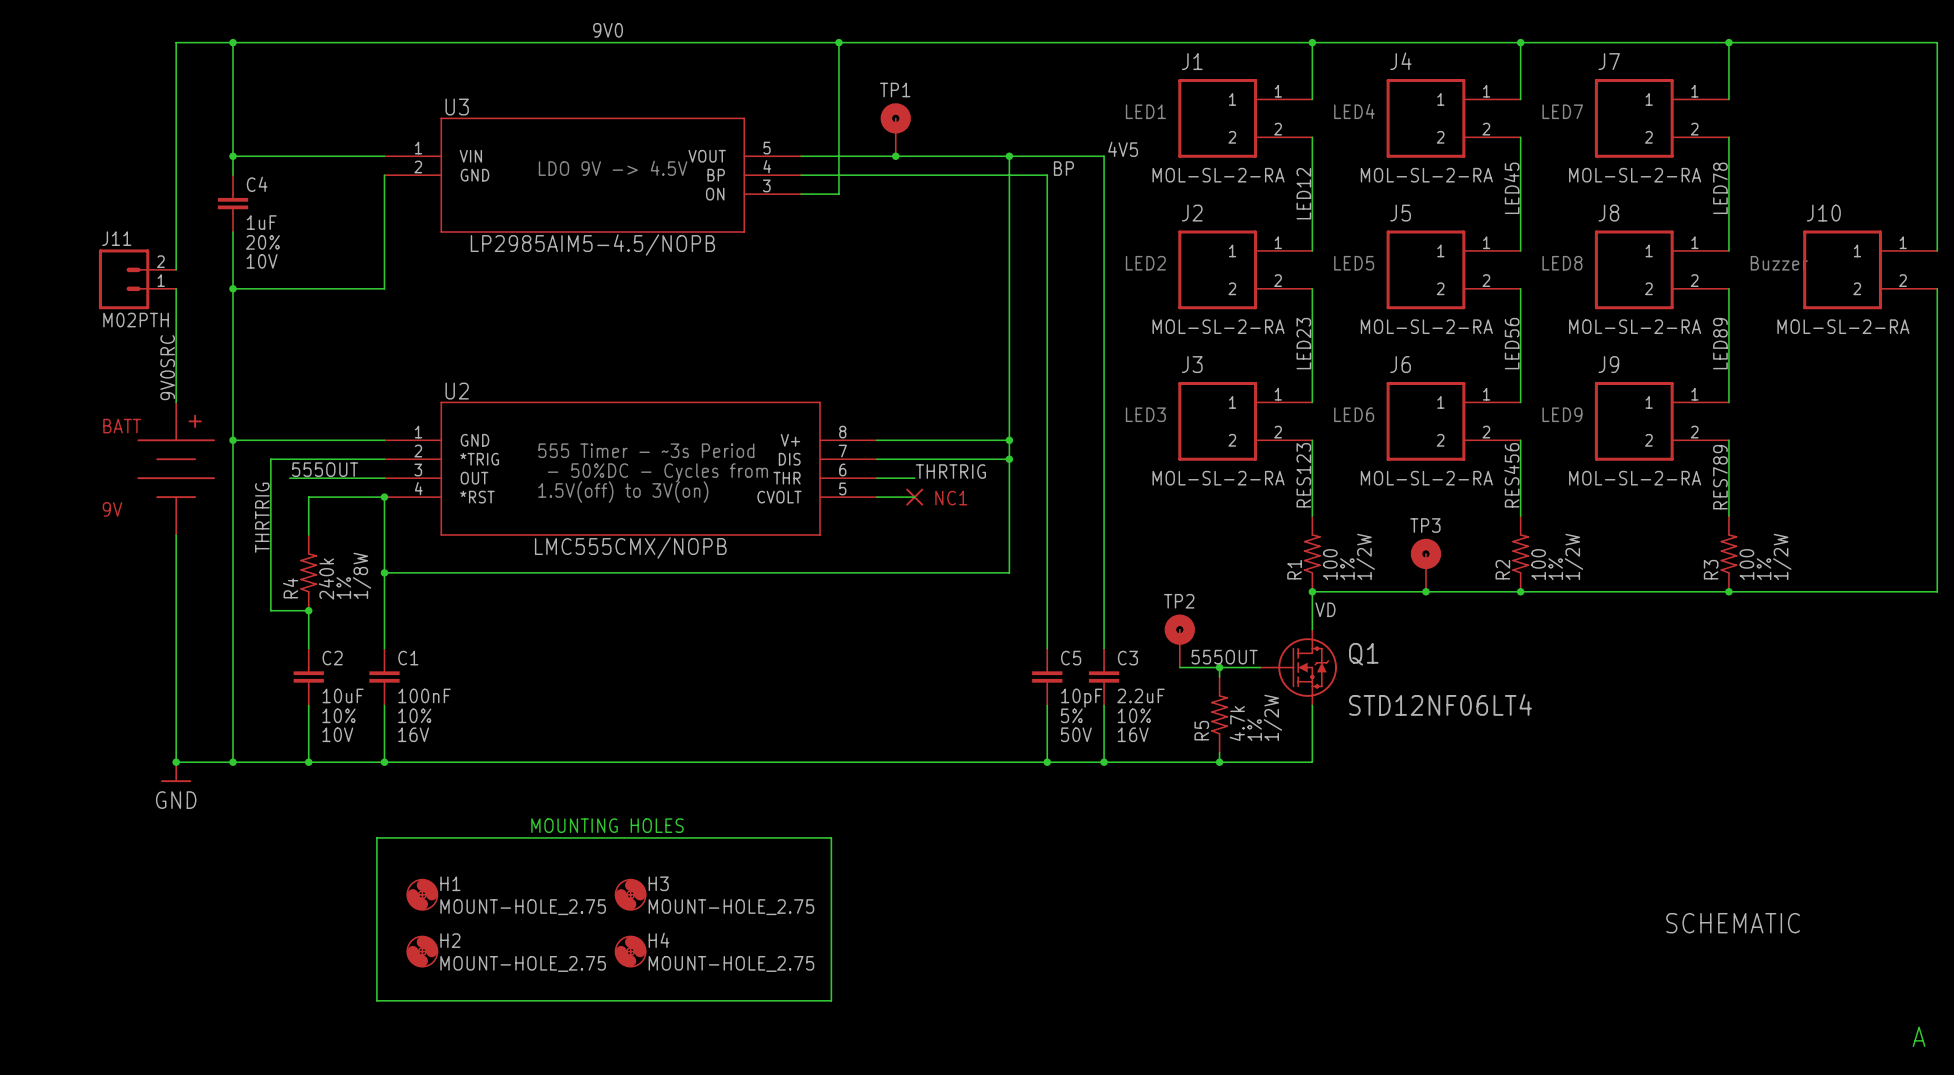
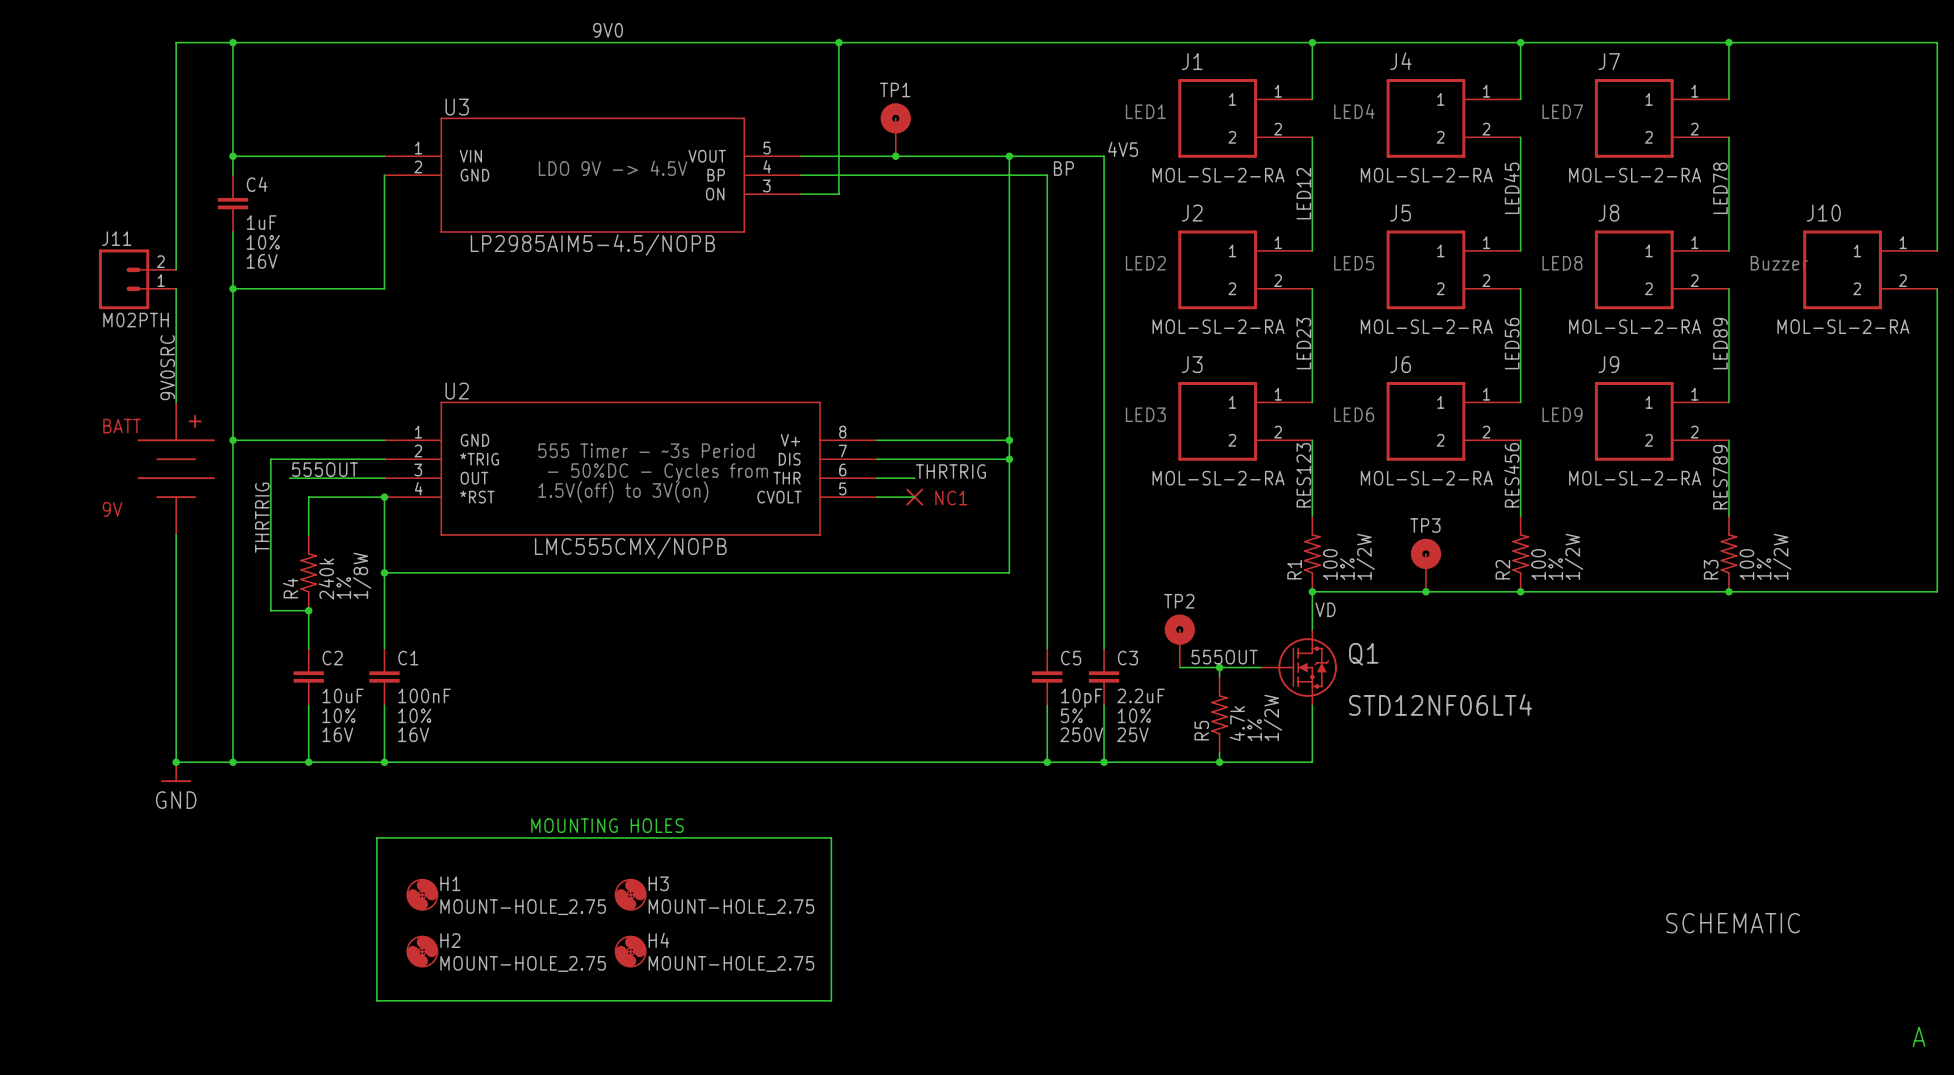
C4 text: 20% (262, 242) -> 10% (263, 242)
C4 text: 10V (262, 261) -> 16V (262, 261)
C2 text: 10V (337, 734) -> 16V (337, 734)
C5 text: 50V (1076, 734) -> 250V (1081, 734)
C3 text: 16V (1133, 734) -> 25V (1132, 734)

